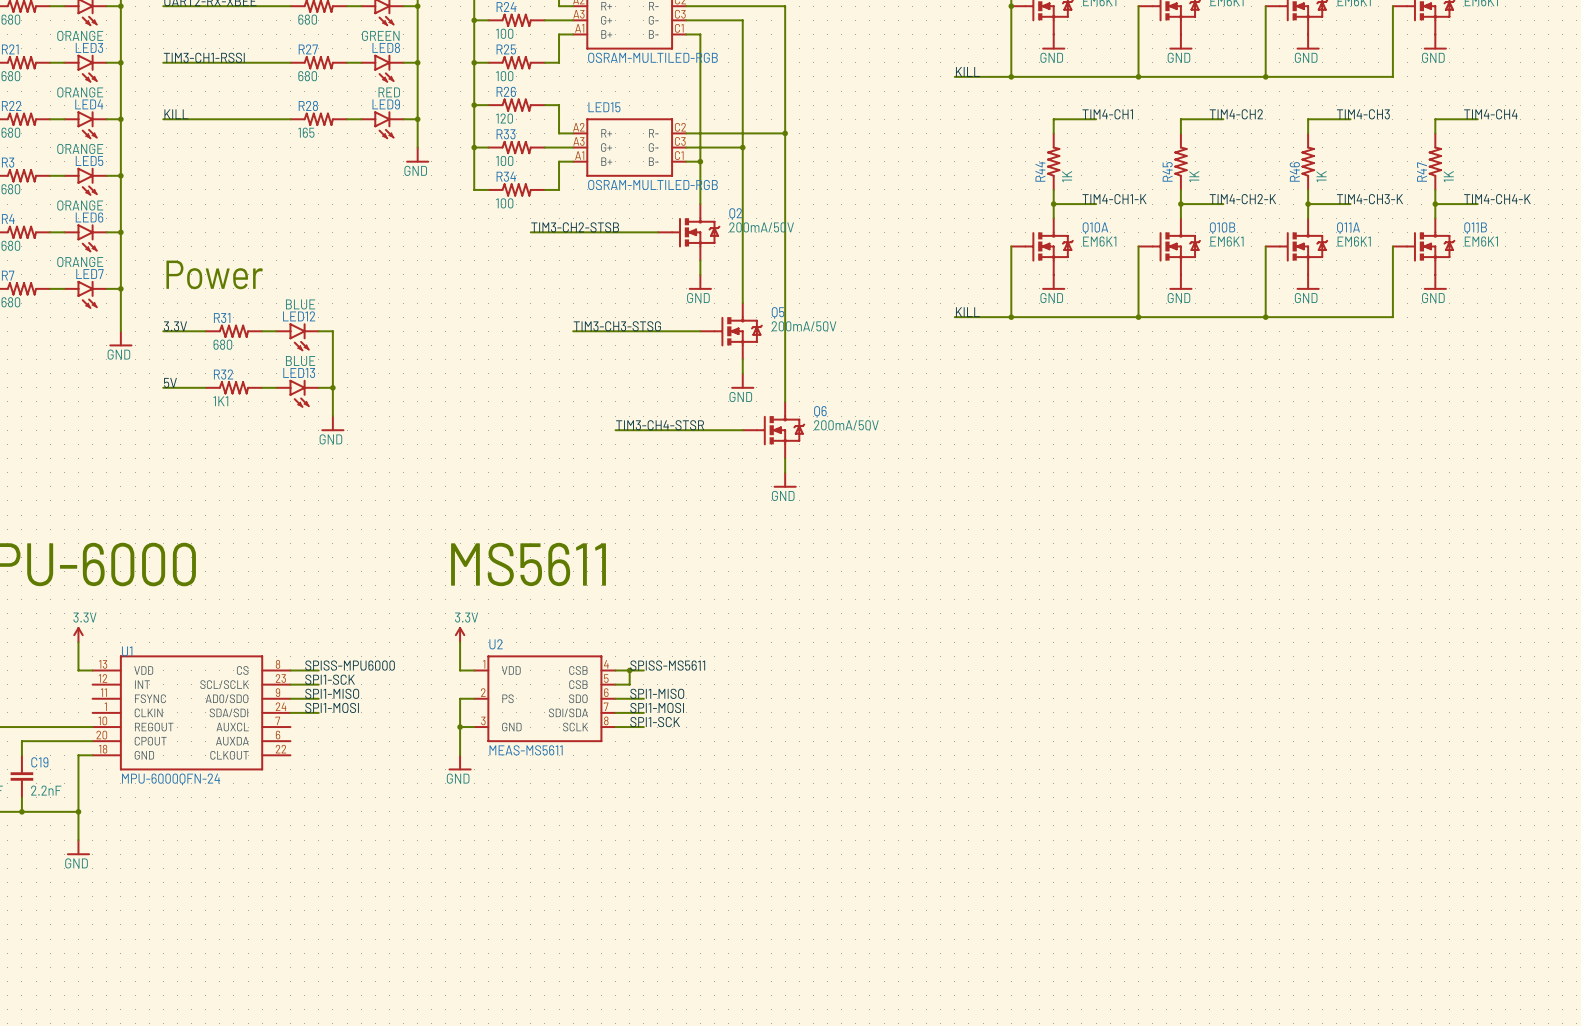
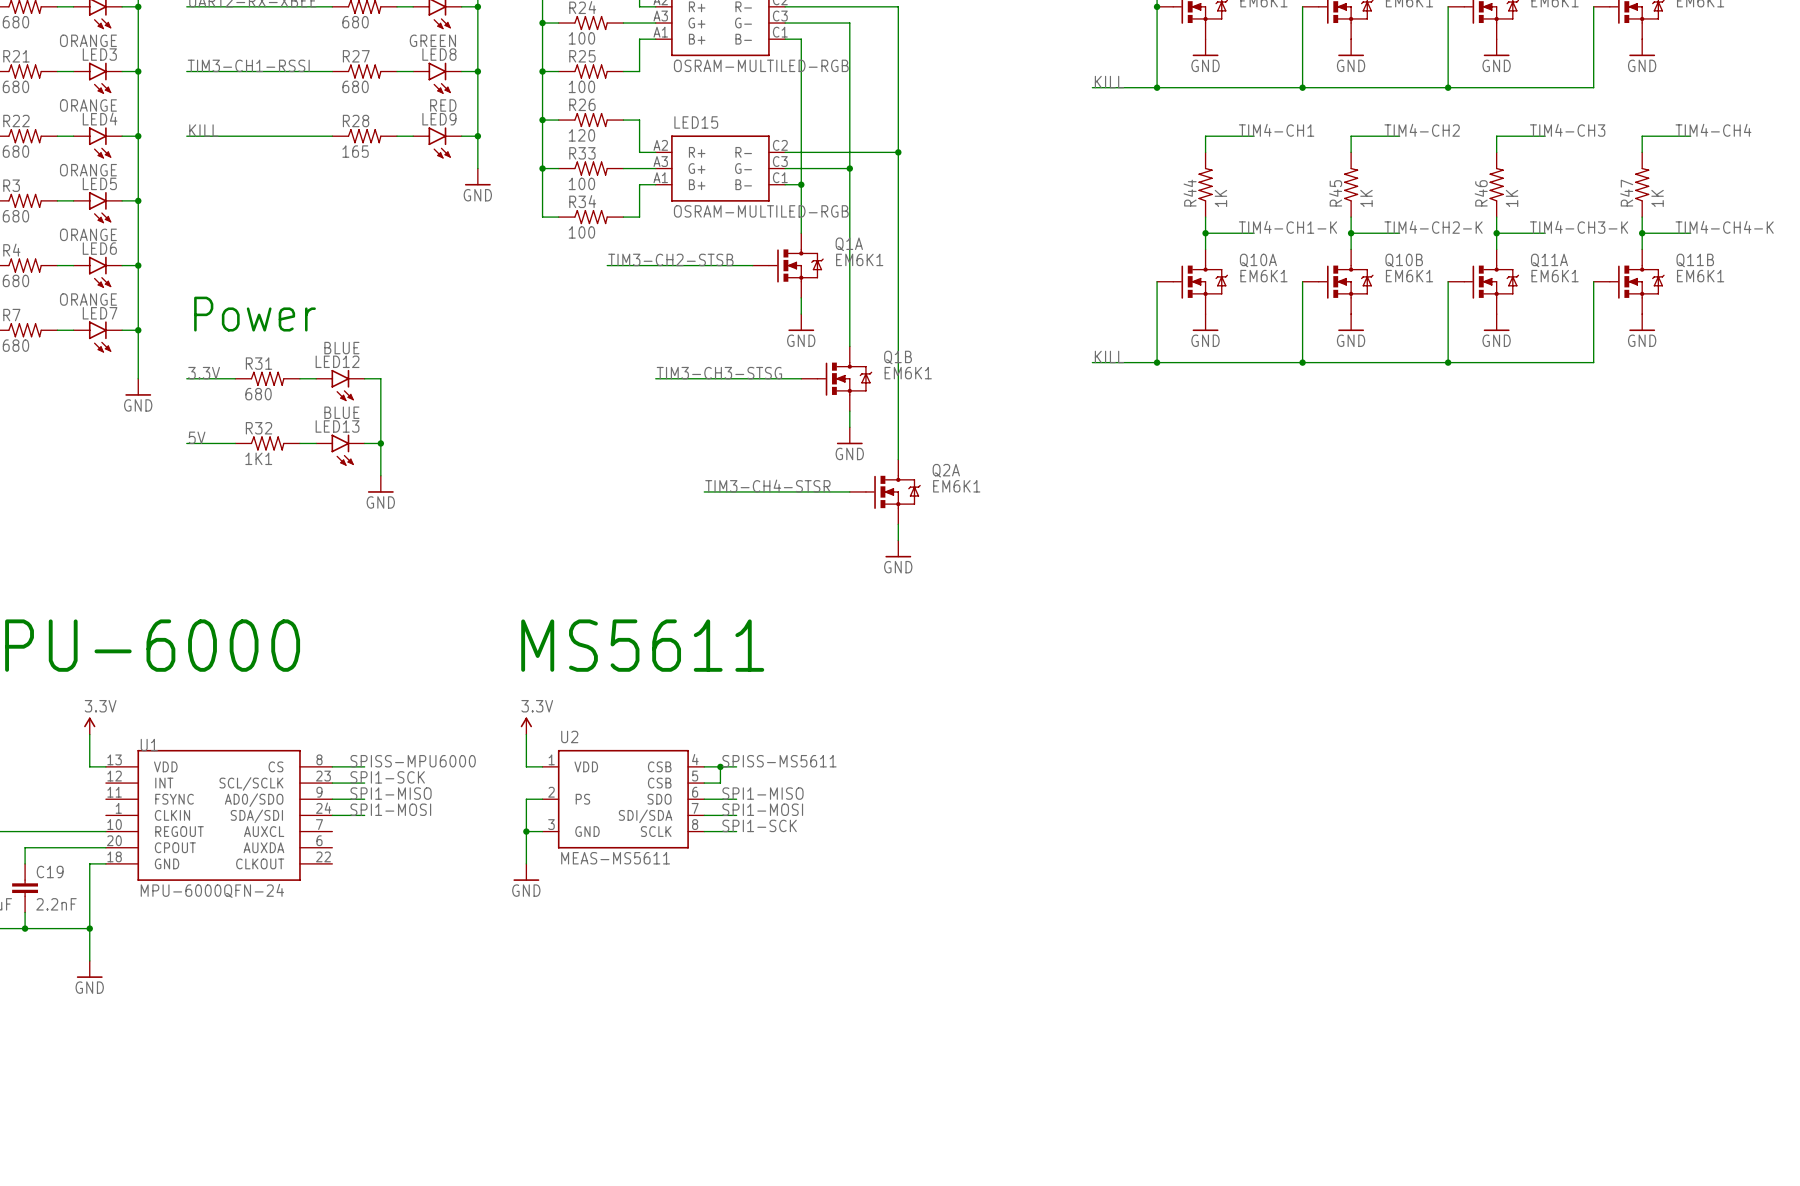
Q2 name: Q2 (735, 214) -> Q1A (849, 244)
Q2 value: 200mA/50V (761, 227) -> EM6K1 (859, 259)
Q5 name: Q5 (778, 312) -> Q1B (898, 357)
Q5 value: 200mA/50V (804, 326) -> EM6K1 (908, 373)
Q6 name: Q6 (820, 411) -> Q2A (946, 470)
Q6 value: 200mA/50V (846, 425) -> EM6K1 (956, 486)

